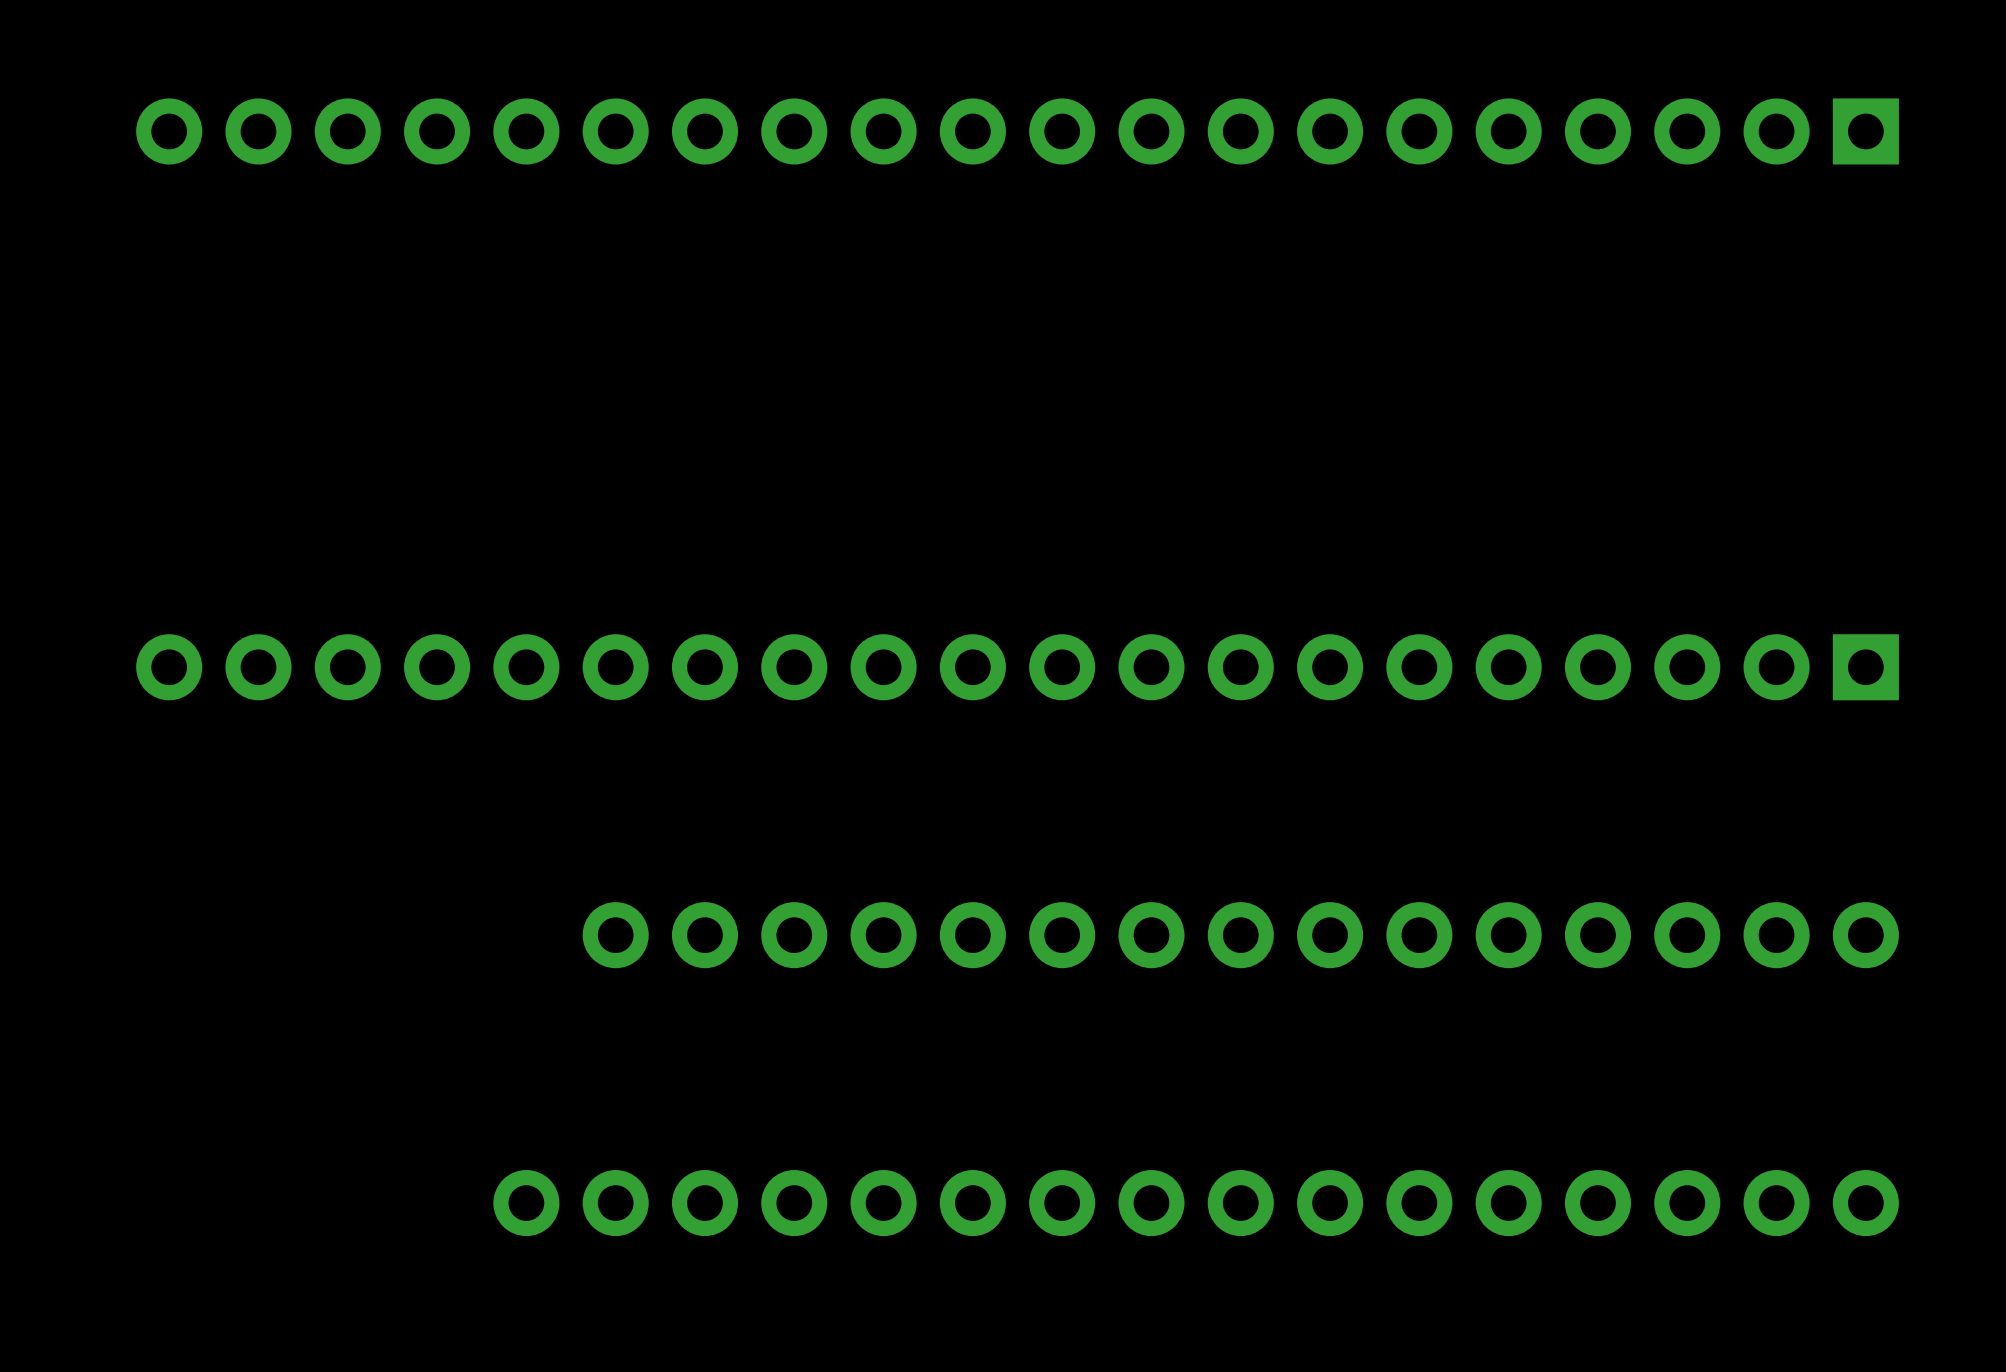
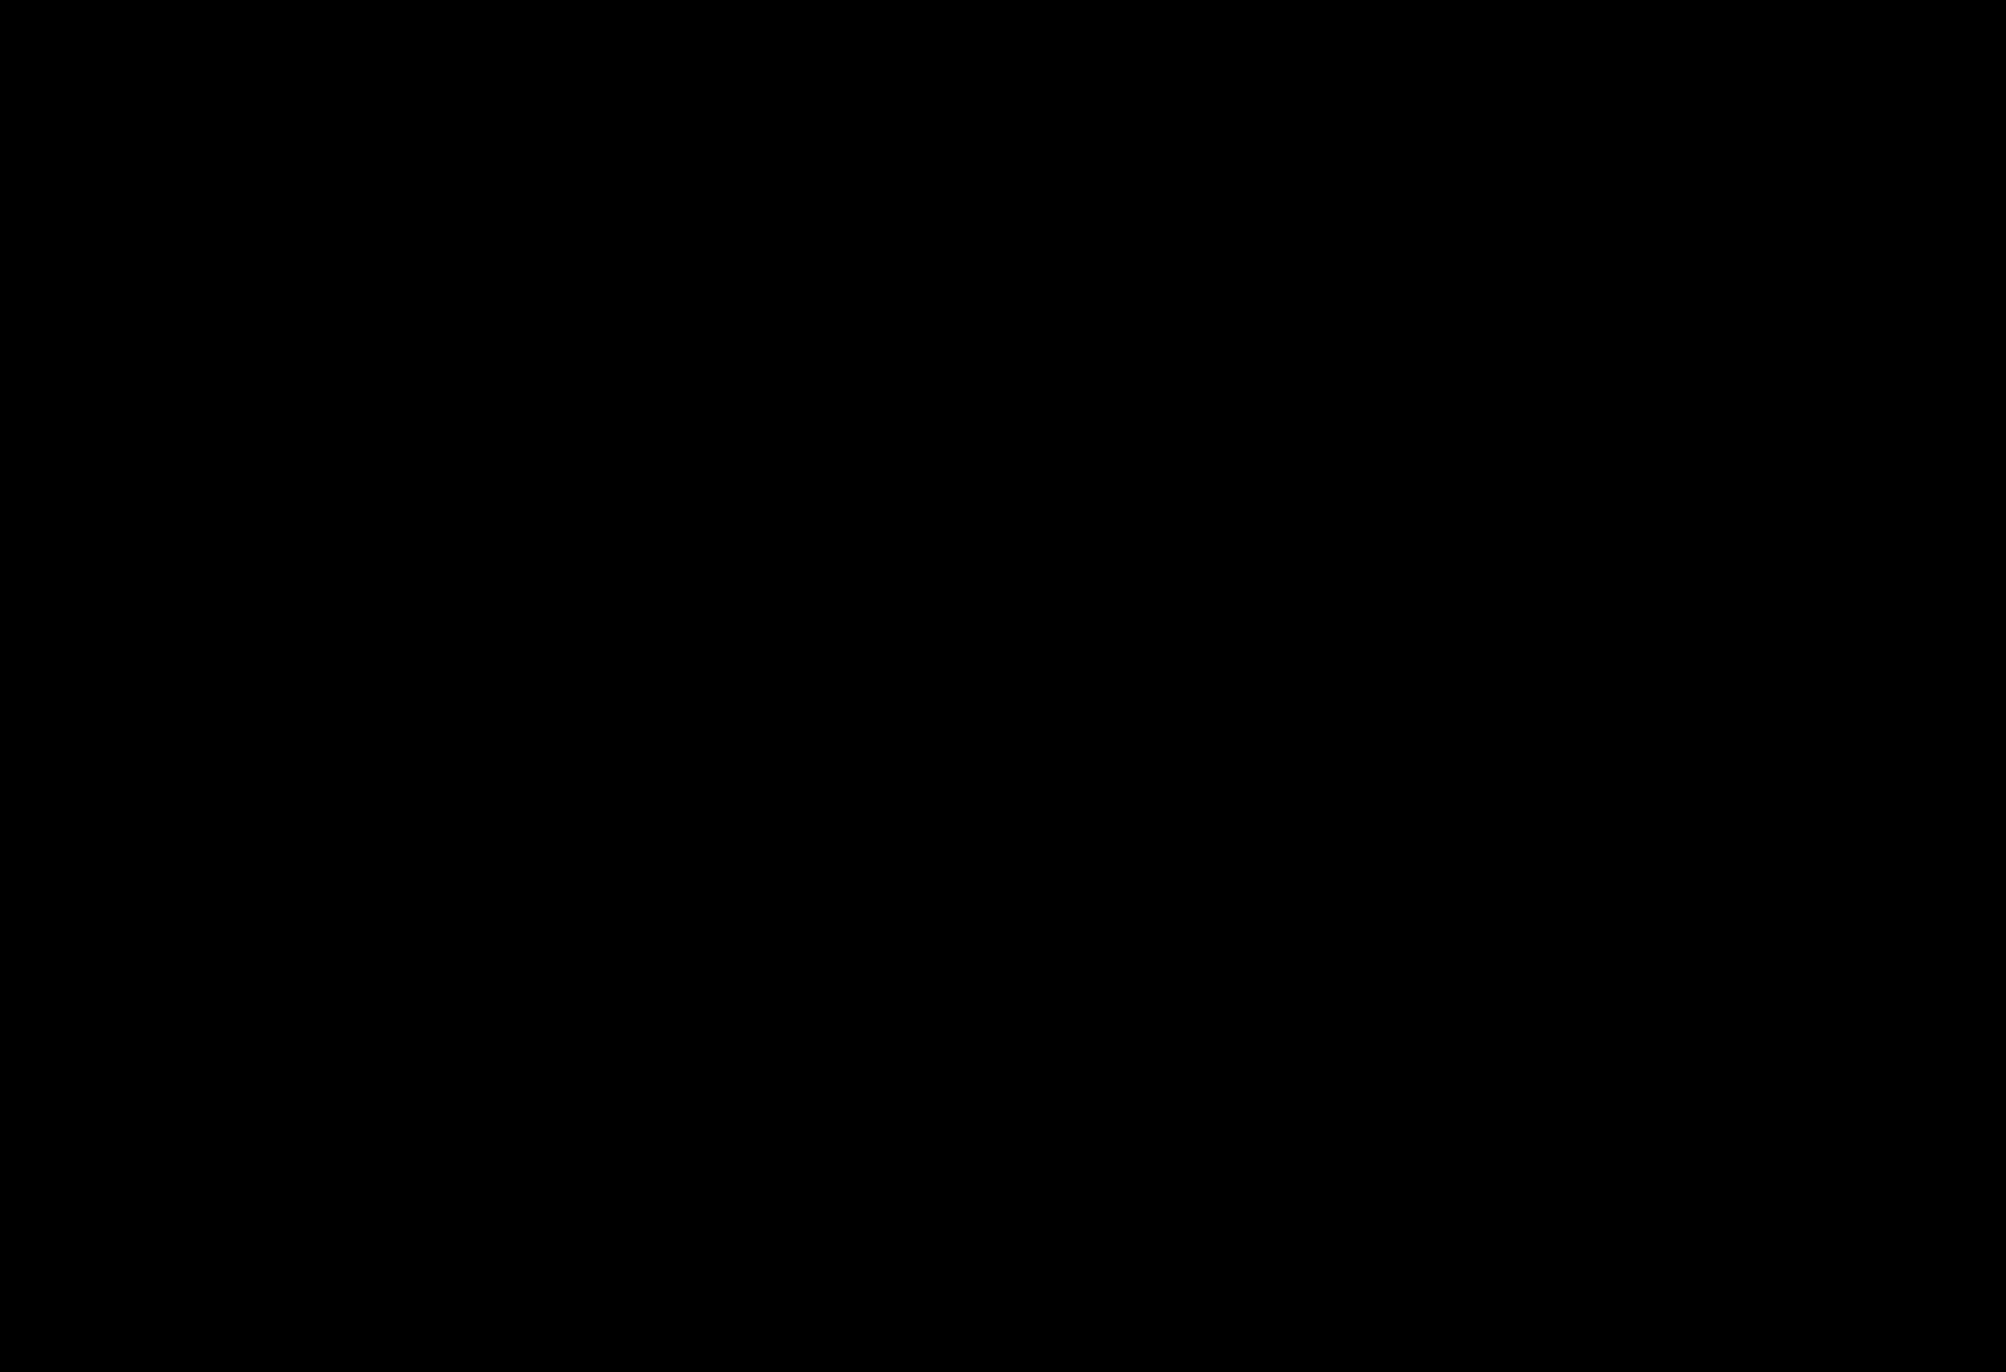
part: (1017, 131) -> none
part: (1017, 667) -> none
part: (1240, 935) -> none
part: (1196, 1203) -> none

